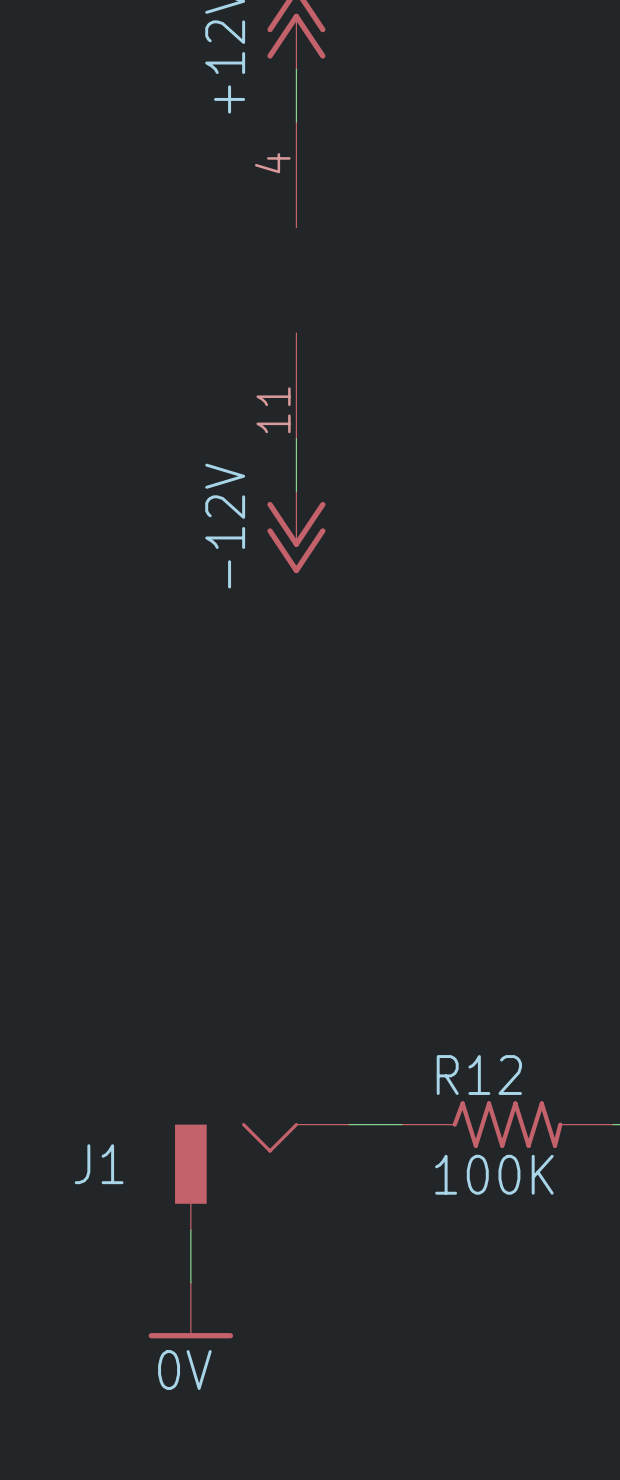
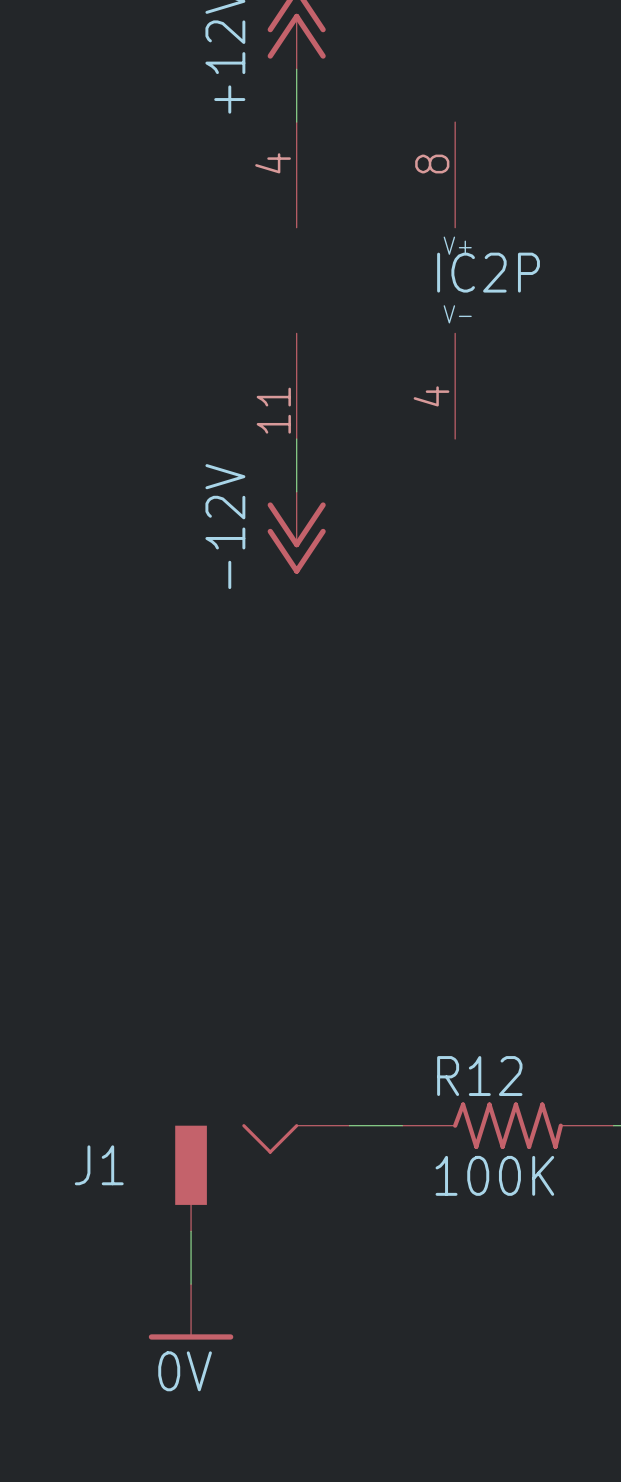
IC2P: none -> (455, 280)

